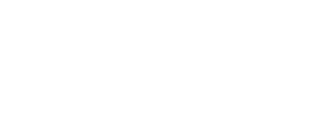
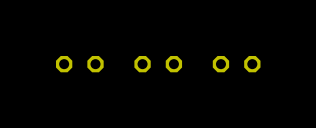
part: none -> (79, 64)
part: none -> (158, 64)
part: none -> (236, 64)

